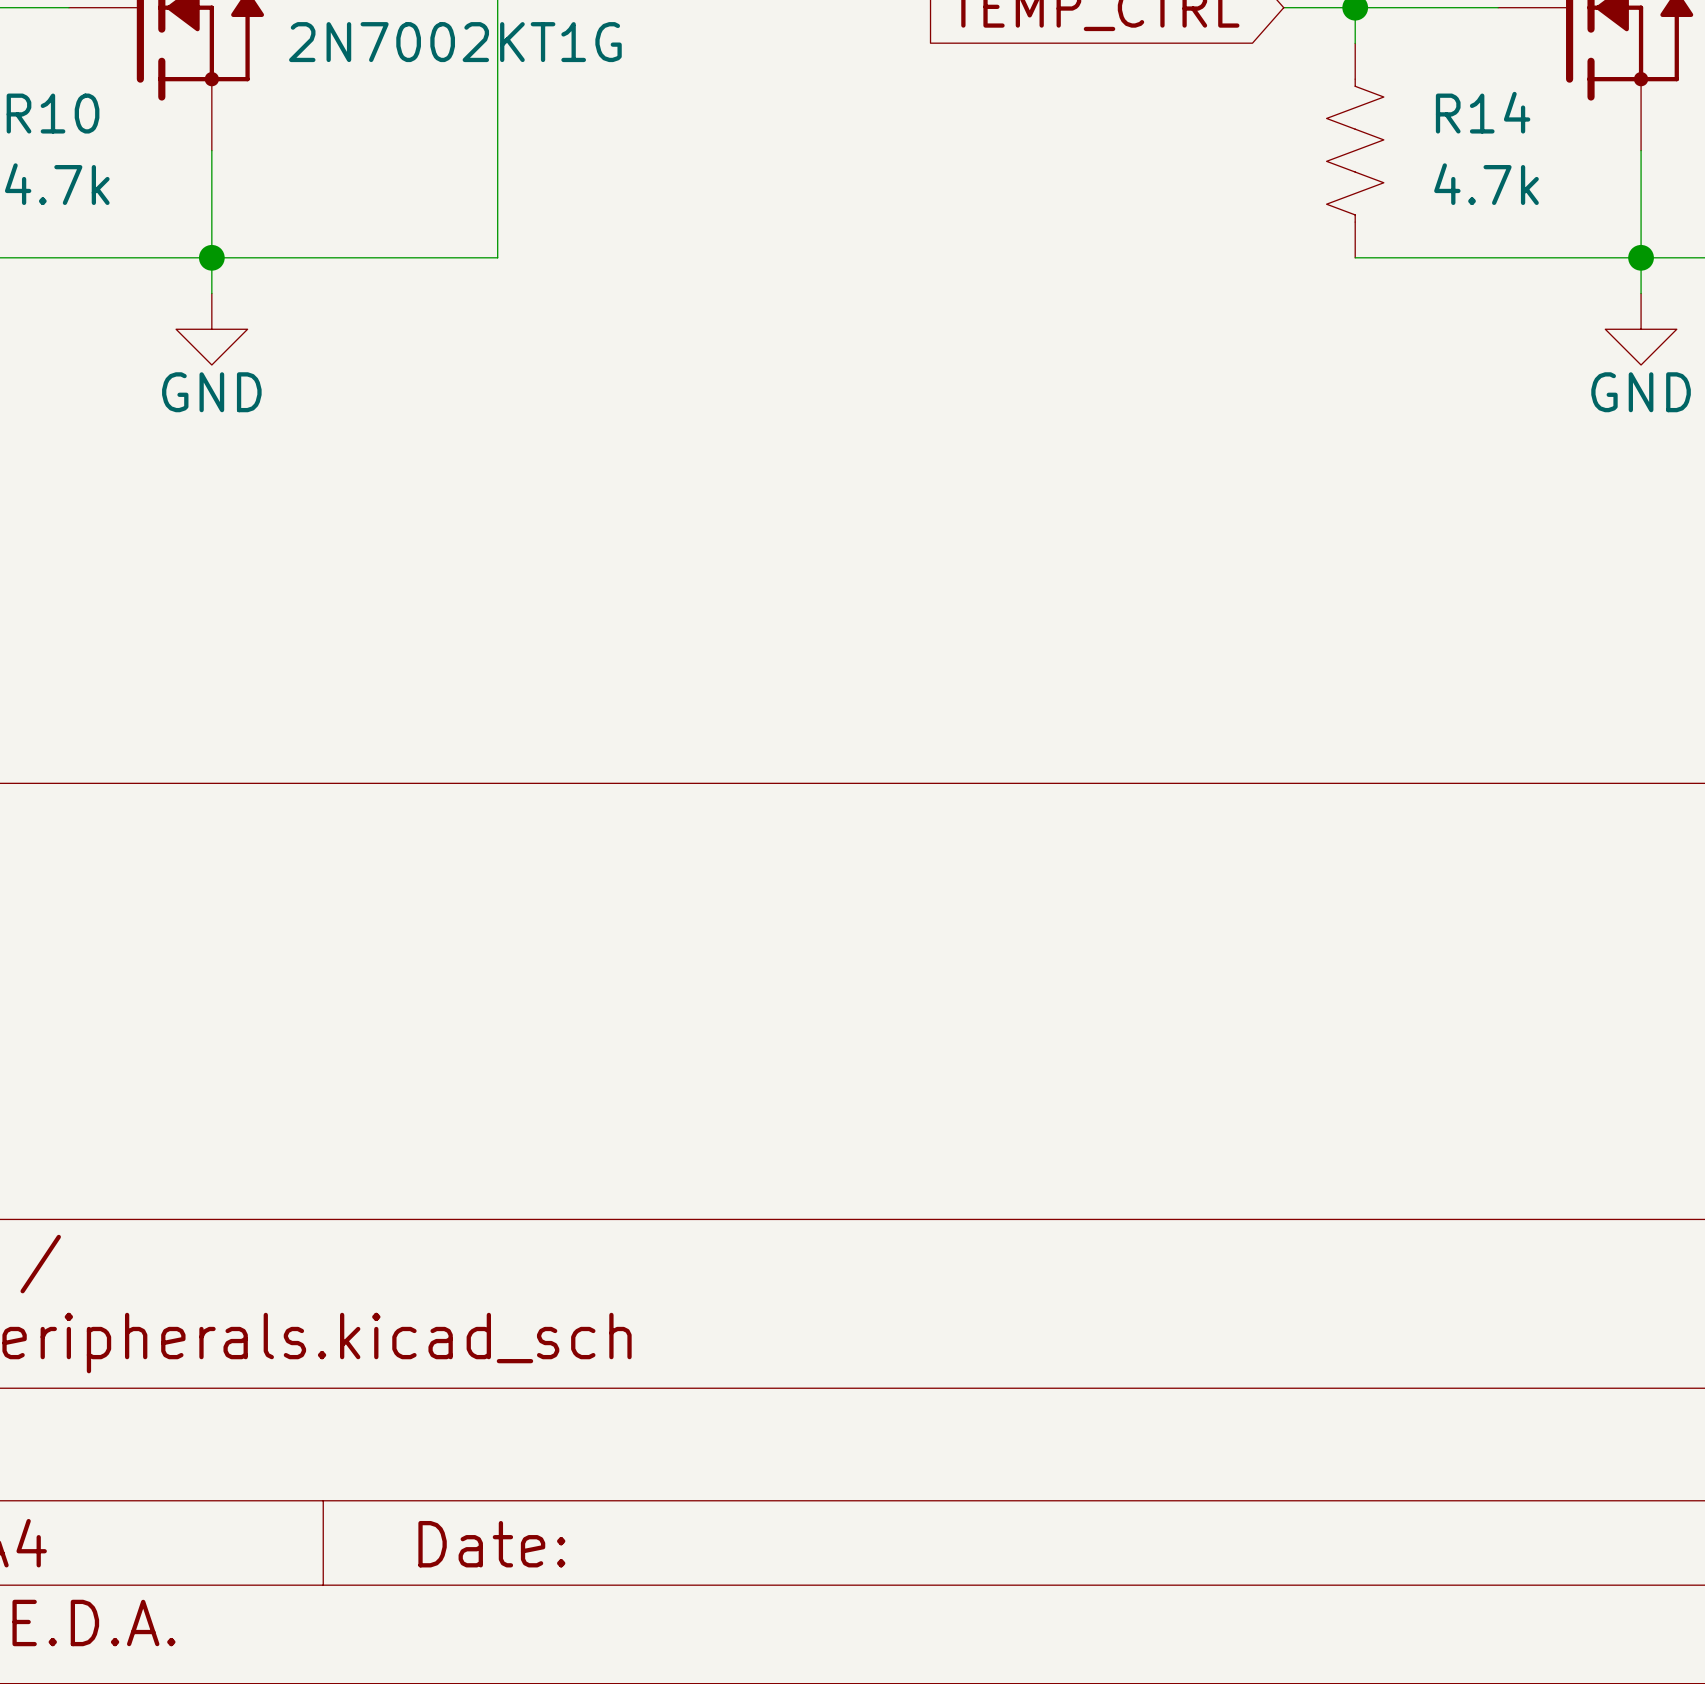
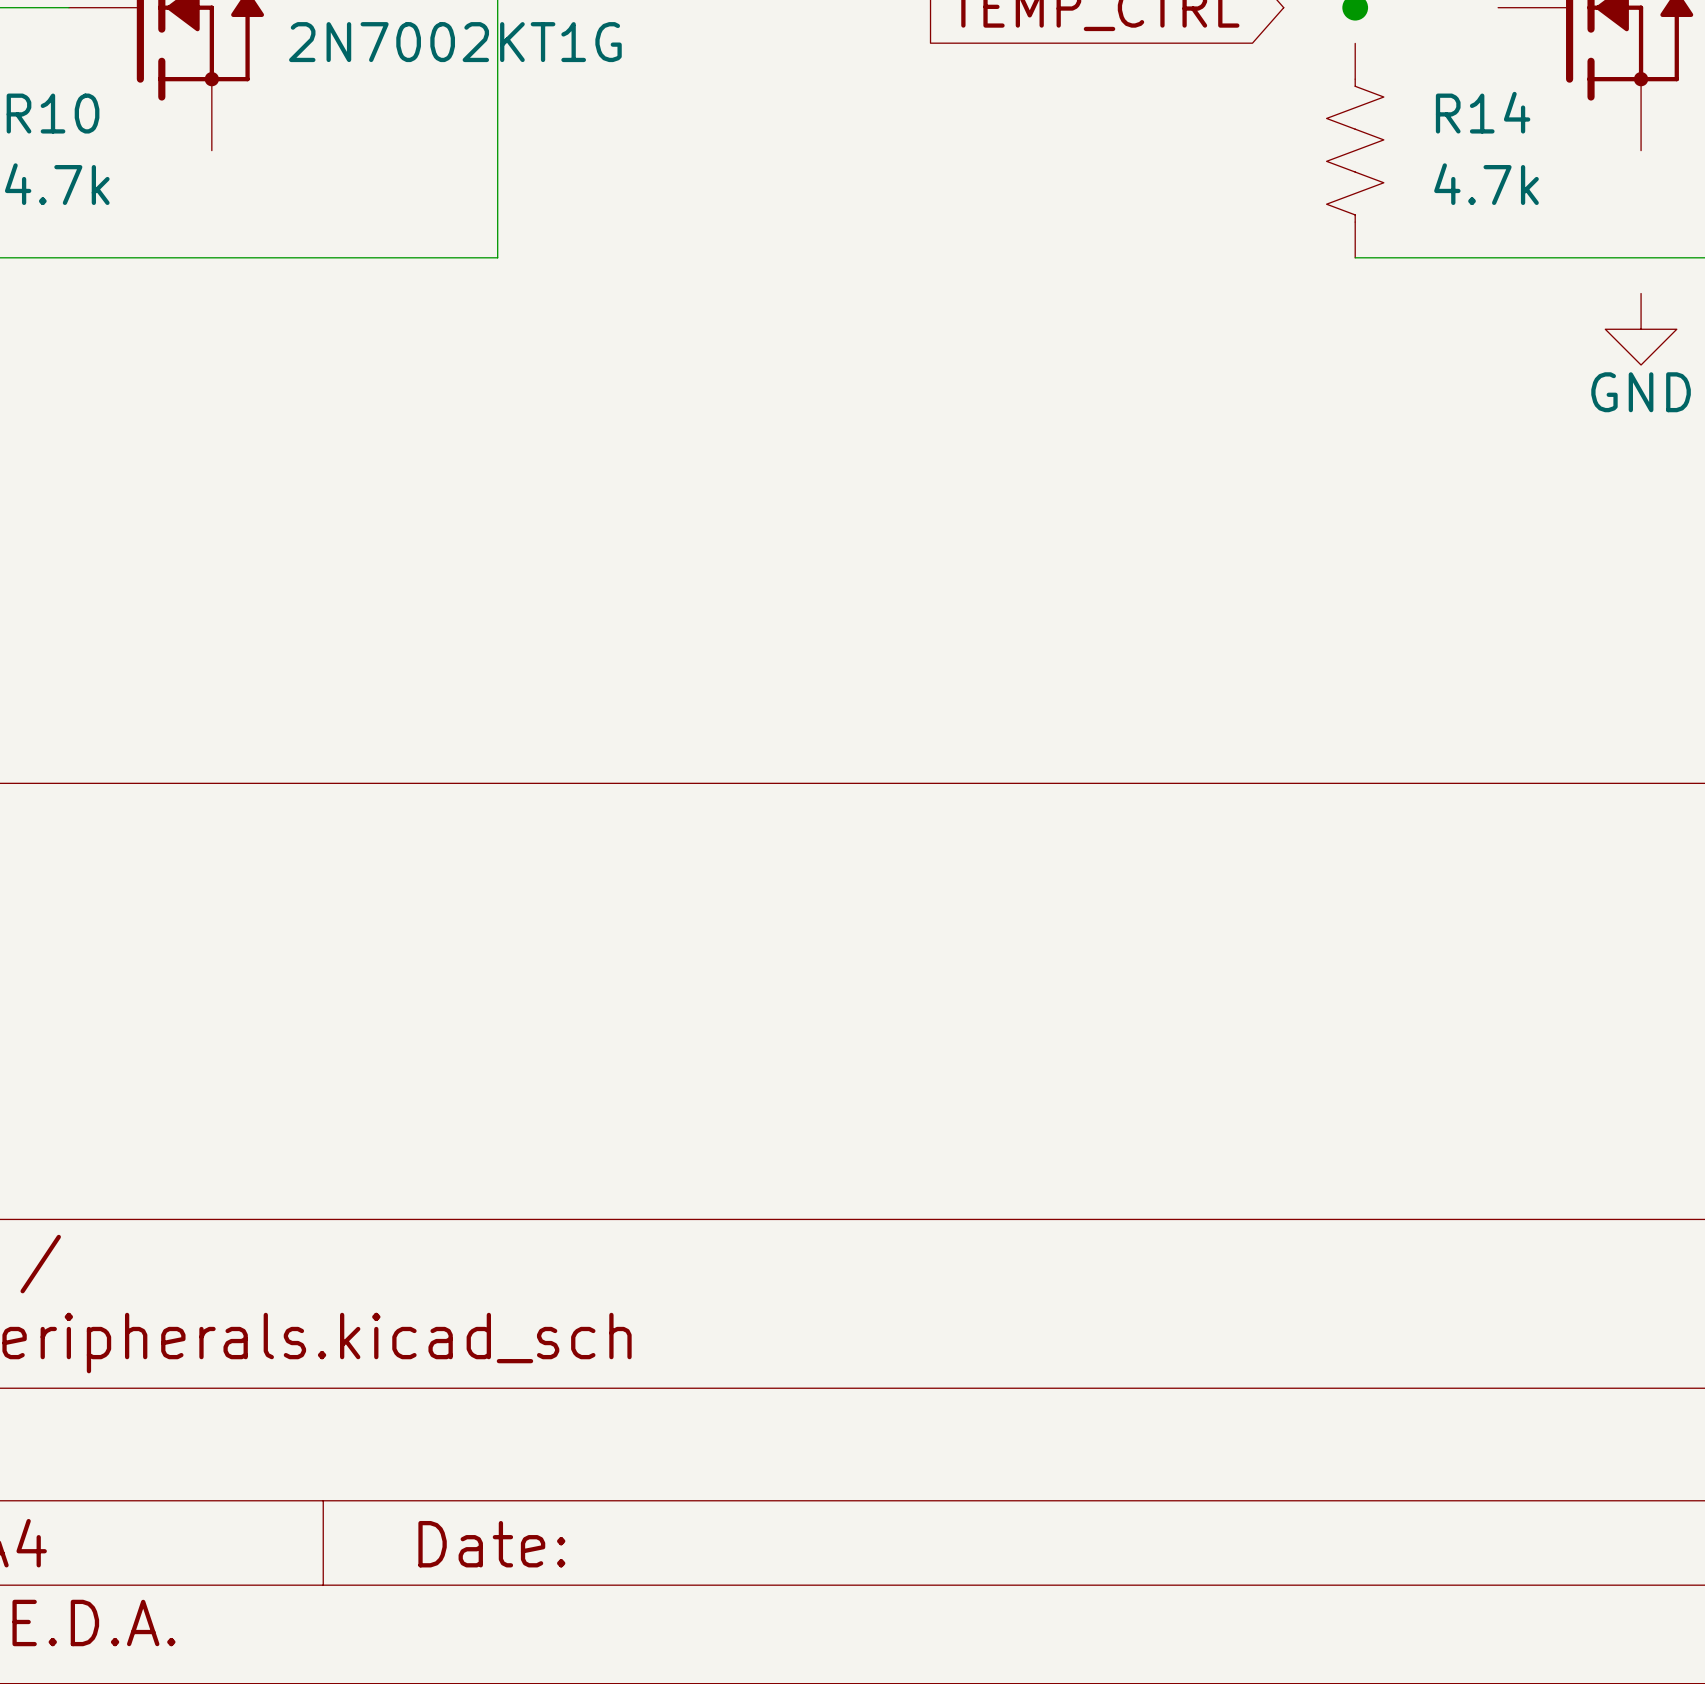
wire: (1283, 7) (1498, 7) -> none
wire: (1355, 7) (1355, 43) -> none
wire: (211, 150) (211, 293) -> none
wire: (1641, 150) (1641, 293) -> none
junction: (211, 257) -> none
junction: (1641, 257) -> none
power symbol: GND (211, 329) -> none

